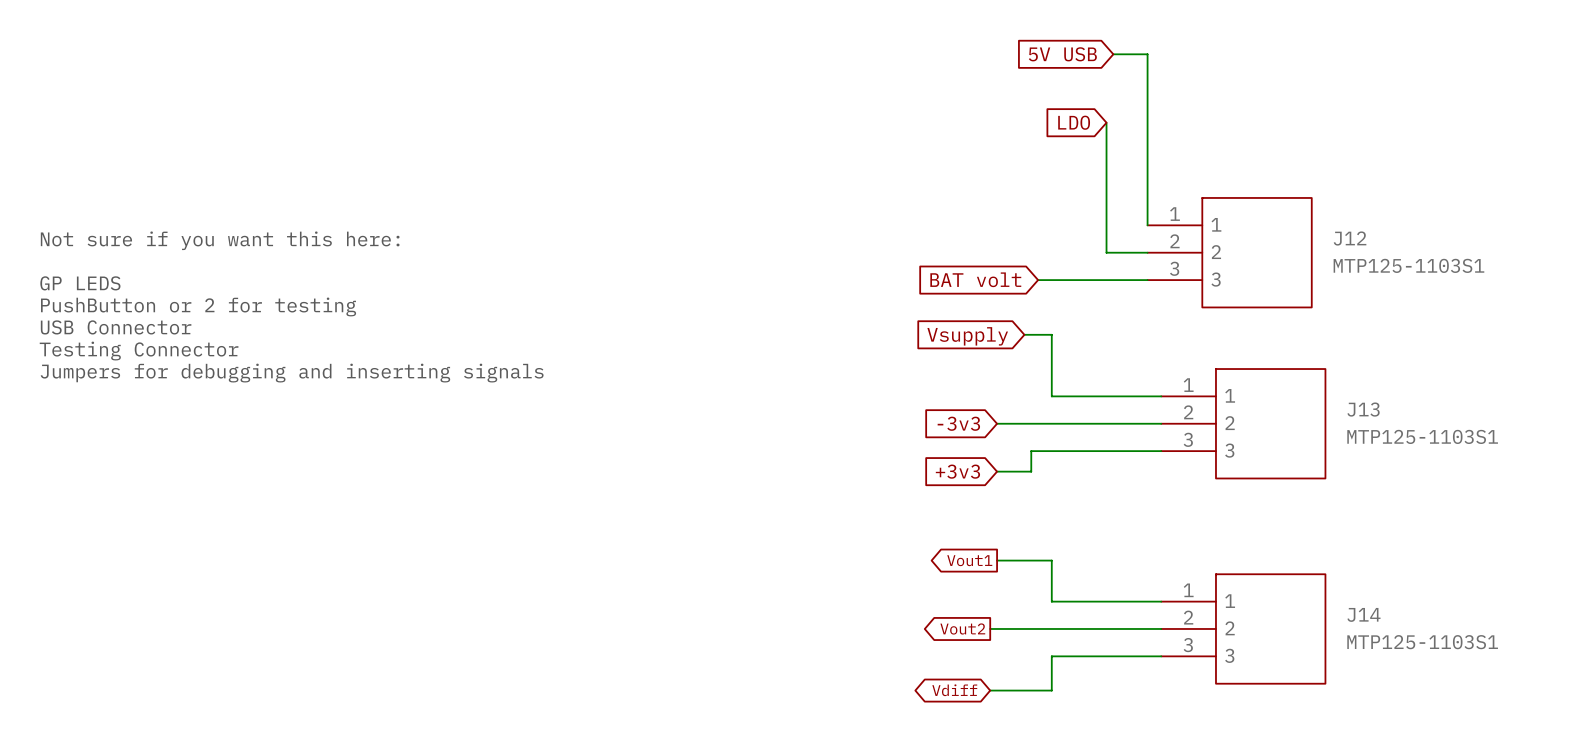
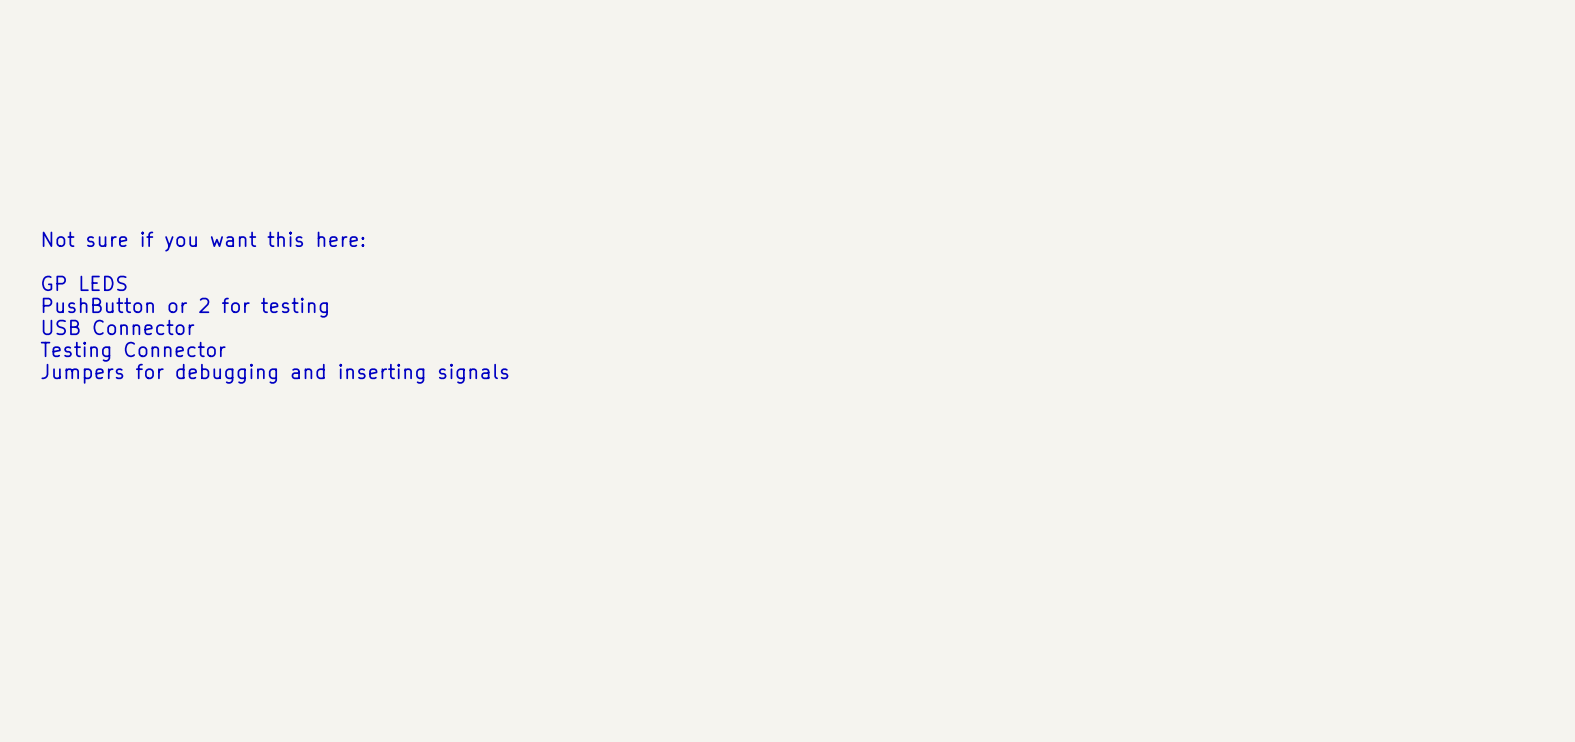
global label: 5V USB (1062, 54) -> none
wire: (1113, 54) (1147, 54) (1147, 225) -> none
global label: LDO (1074, 122) -> none
wire: (1106, 122) (1106, 252) (1147, 252) -> none
J12: MTP125-1103S1 (1230, 252) -> none
global label: BAT volt (975, 279) -> none
wire: (1038, 280) (1147, 280) -> none
wire: (1024, 334) (1051, 334) (1051, 396) (1161, 396) -> none
global label: Vsupply (967, 336) -> none
global label: -3v3 (958, 423) -> none
wire: (997, 423) (1161, 423) -> none
J13: MTP125-1103S1 (1243, 423) -> none
wire: (1161, 451) (1031, 451) (1031, 471) (997, 471) -> none
global label: +3v3 (957, 471) -> none
global label: Vout1 (969, 560) -> none
wire: (997, 560) (1051, 560) (1051, 601) (1161, 601) -> none
global label: Vout2 (962, 628) -> none
wire: (990, 628) (1161, 628) -> none
J14: MTP125-1103S1 (1243, 628) -> none
wire: (1161, 656) (1051, 656) (1051, 690) (990, 690) -> none
global label: Vdiff (954, 690) -> none

